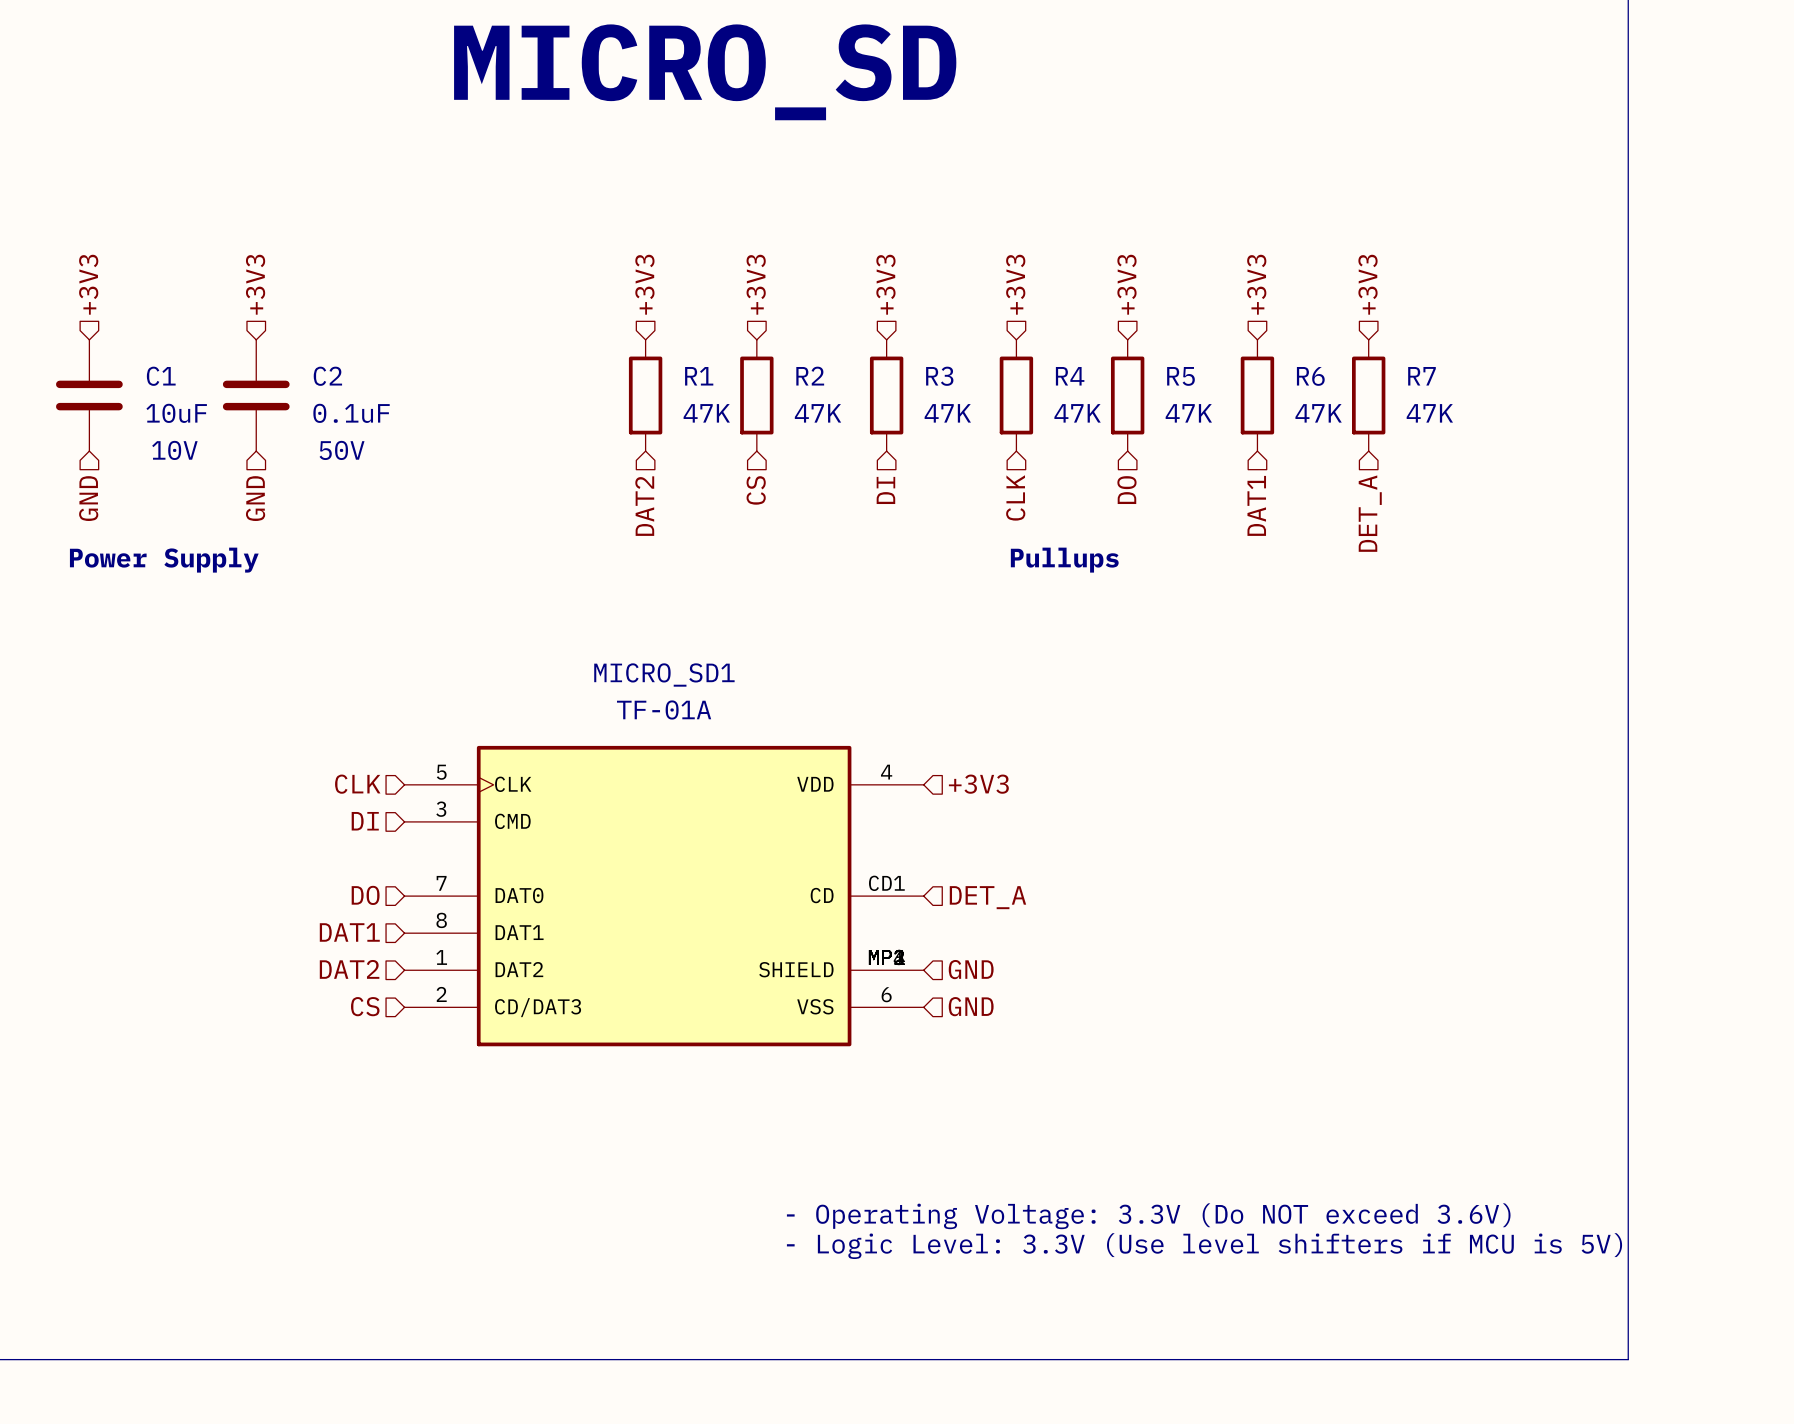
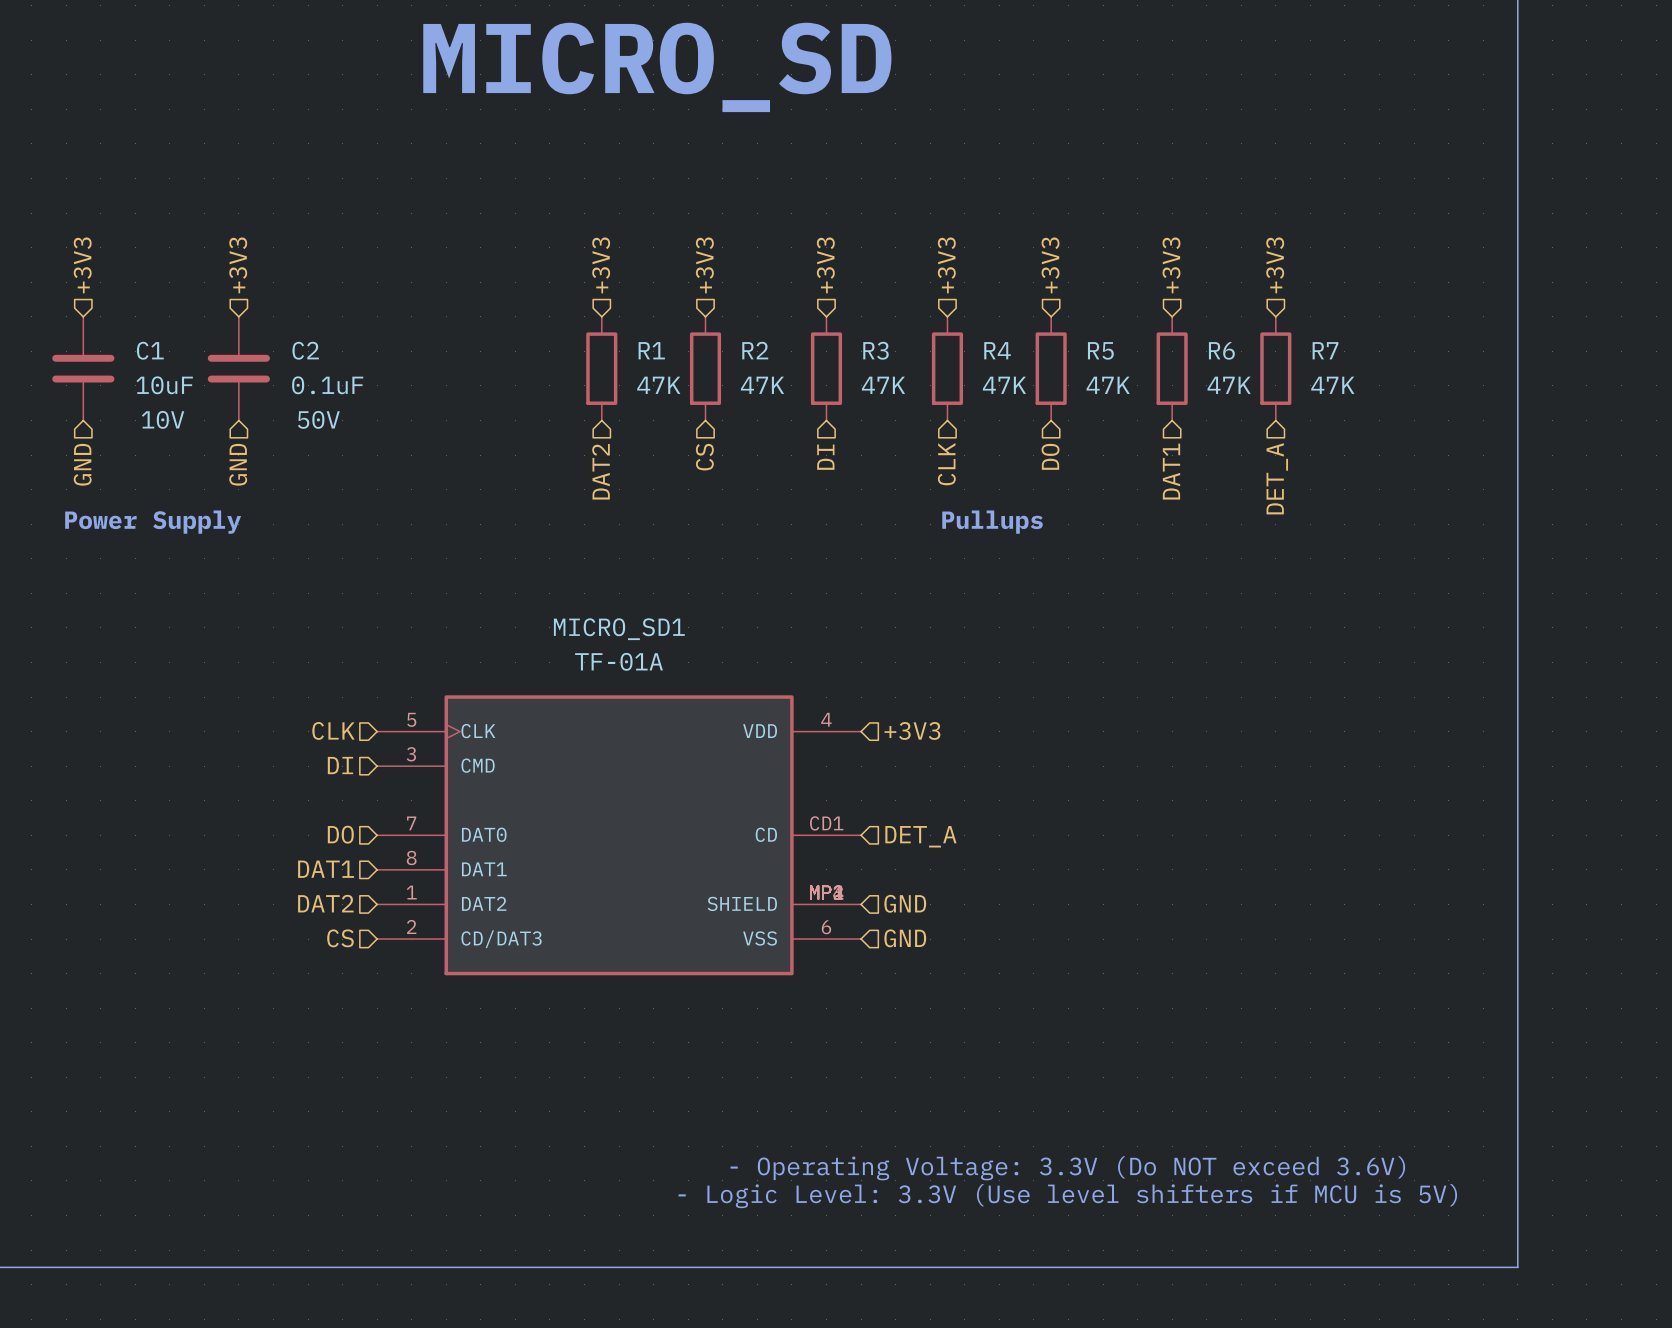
text: - Operating Voltage: 3.3V (Do NOT exceed 3.6V) (1148, 1216) -> none
text: - Logic Level: 3.3V (Use level shifters if MCU is 5V) (1204, 1246) -> none
text: none -> - Operating Voltage: 3.3V (Do NOT exceed 3.6V) (1067, 1168)
text: none -> - Logic Level: 3.3V (Use level shifters if MCU is 5V) (1067, 1196)

